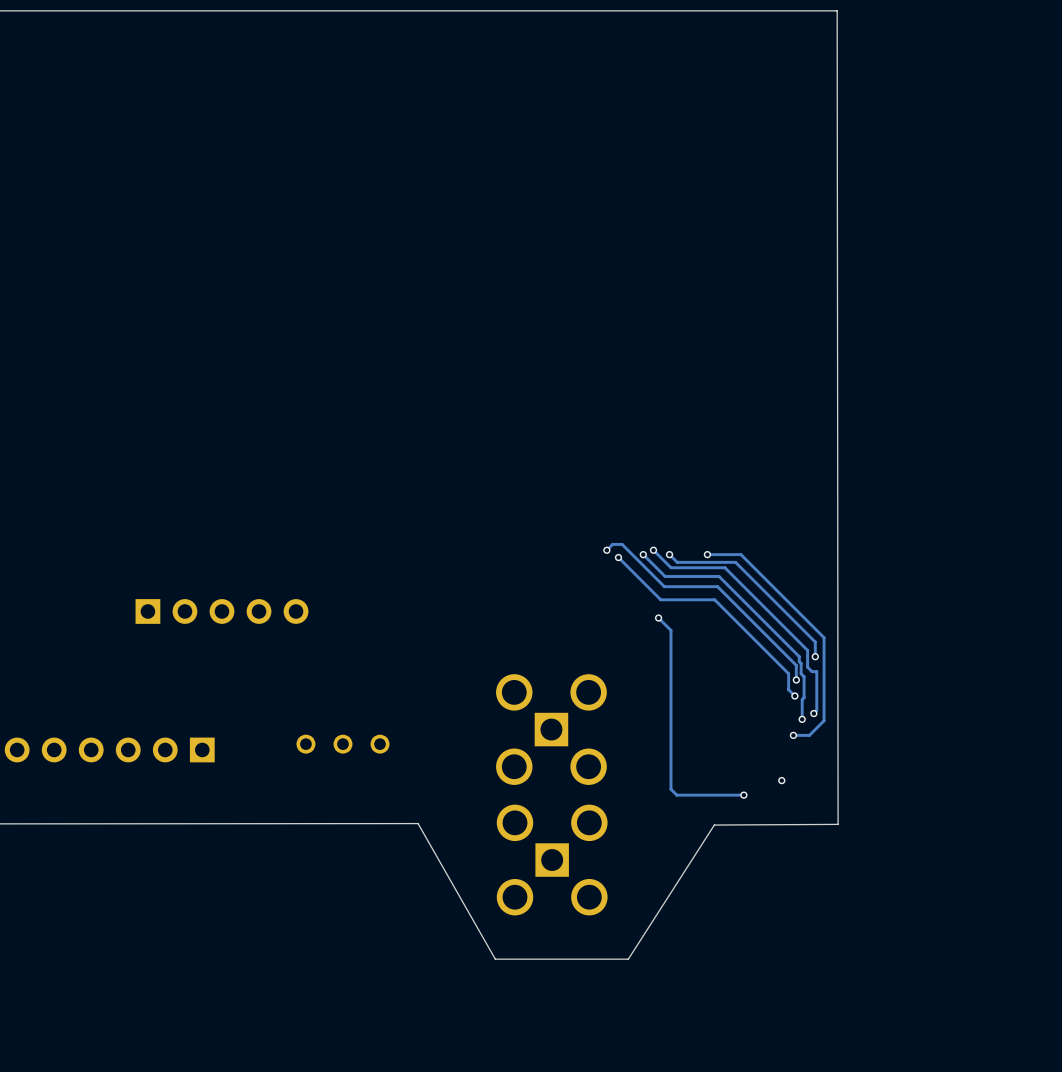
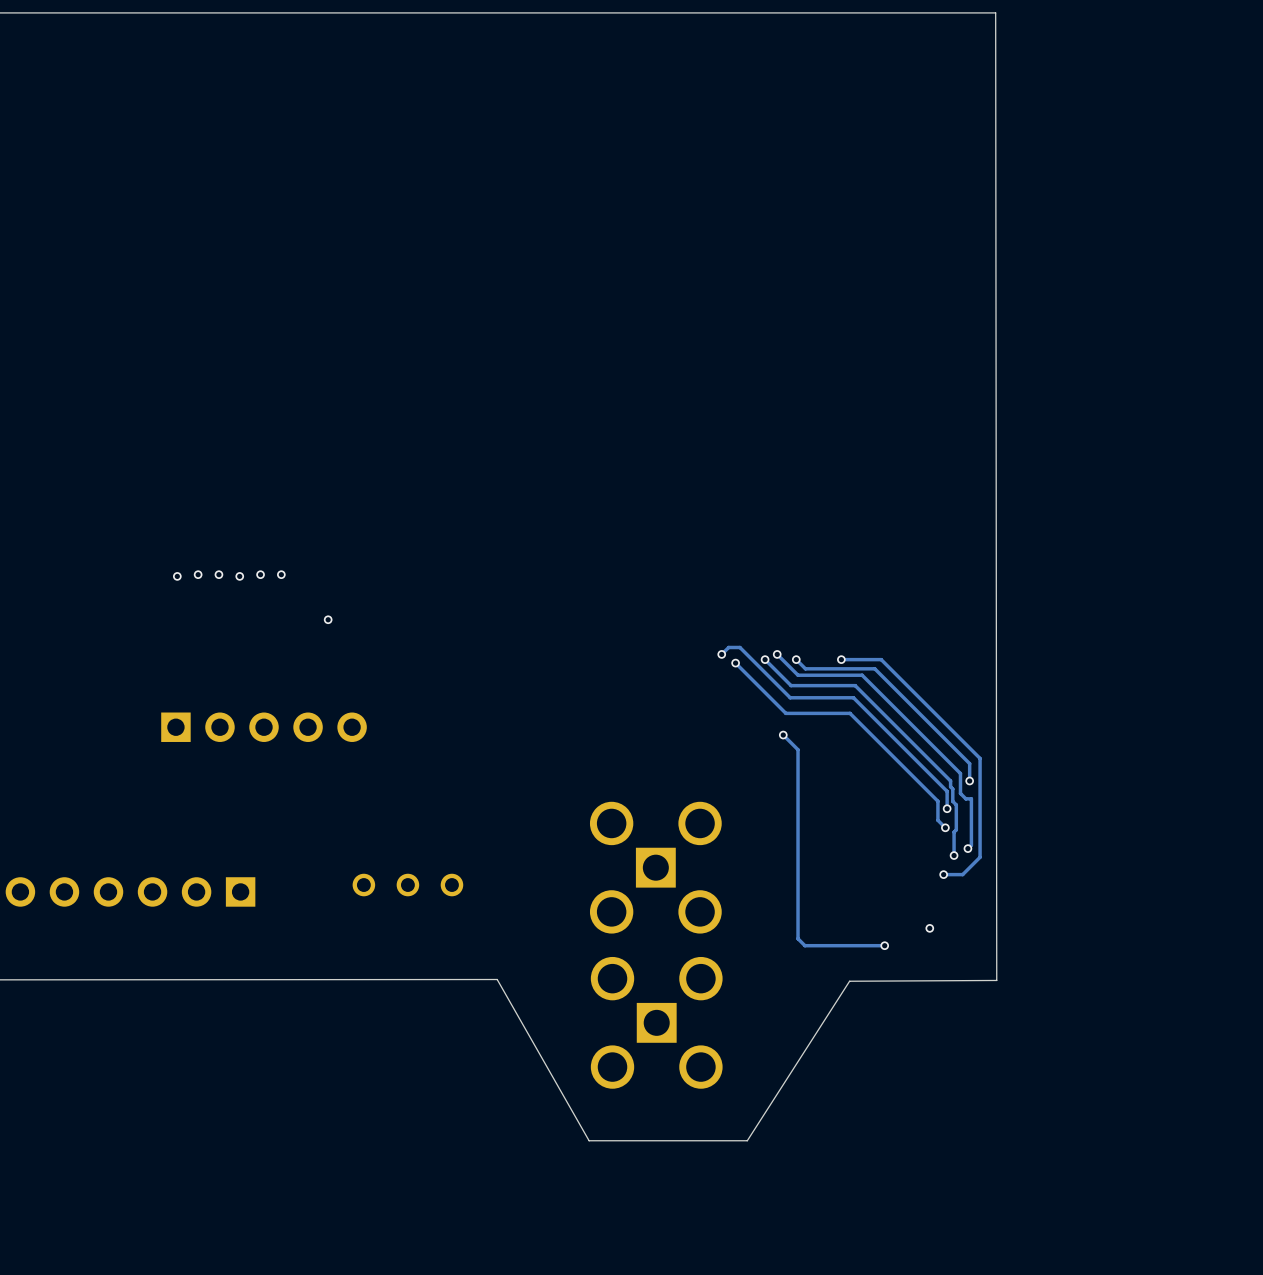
via: none -> (198, 574)
via: none -> (218, 574)
via: none -> (260, 574)
via: none -> (281, 574)
via: none -> (177, 576)
via: none -> (239, 576)
via: none -> (328, 619)

